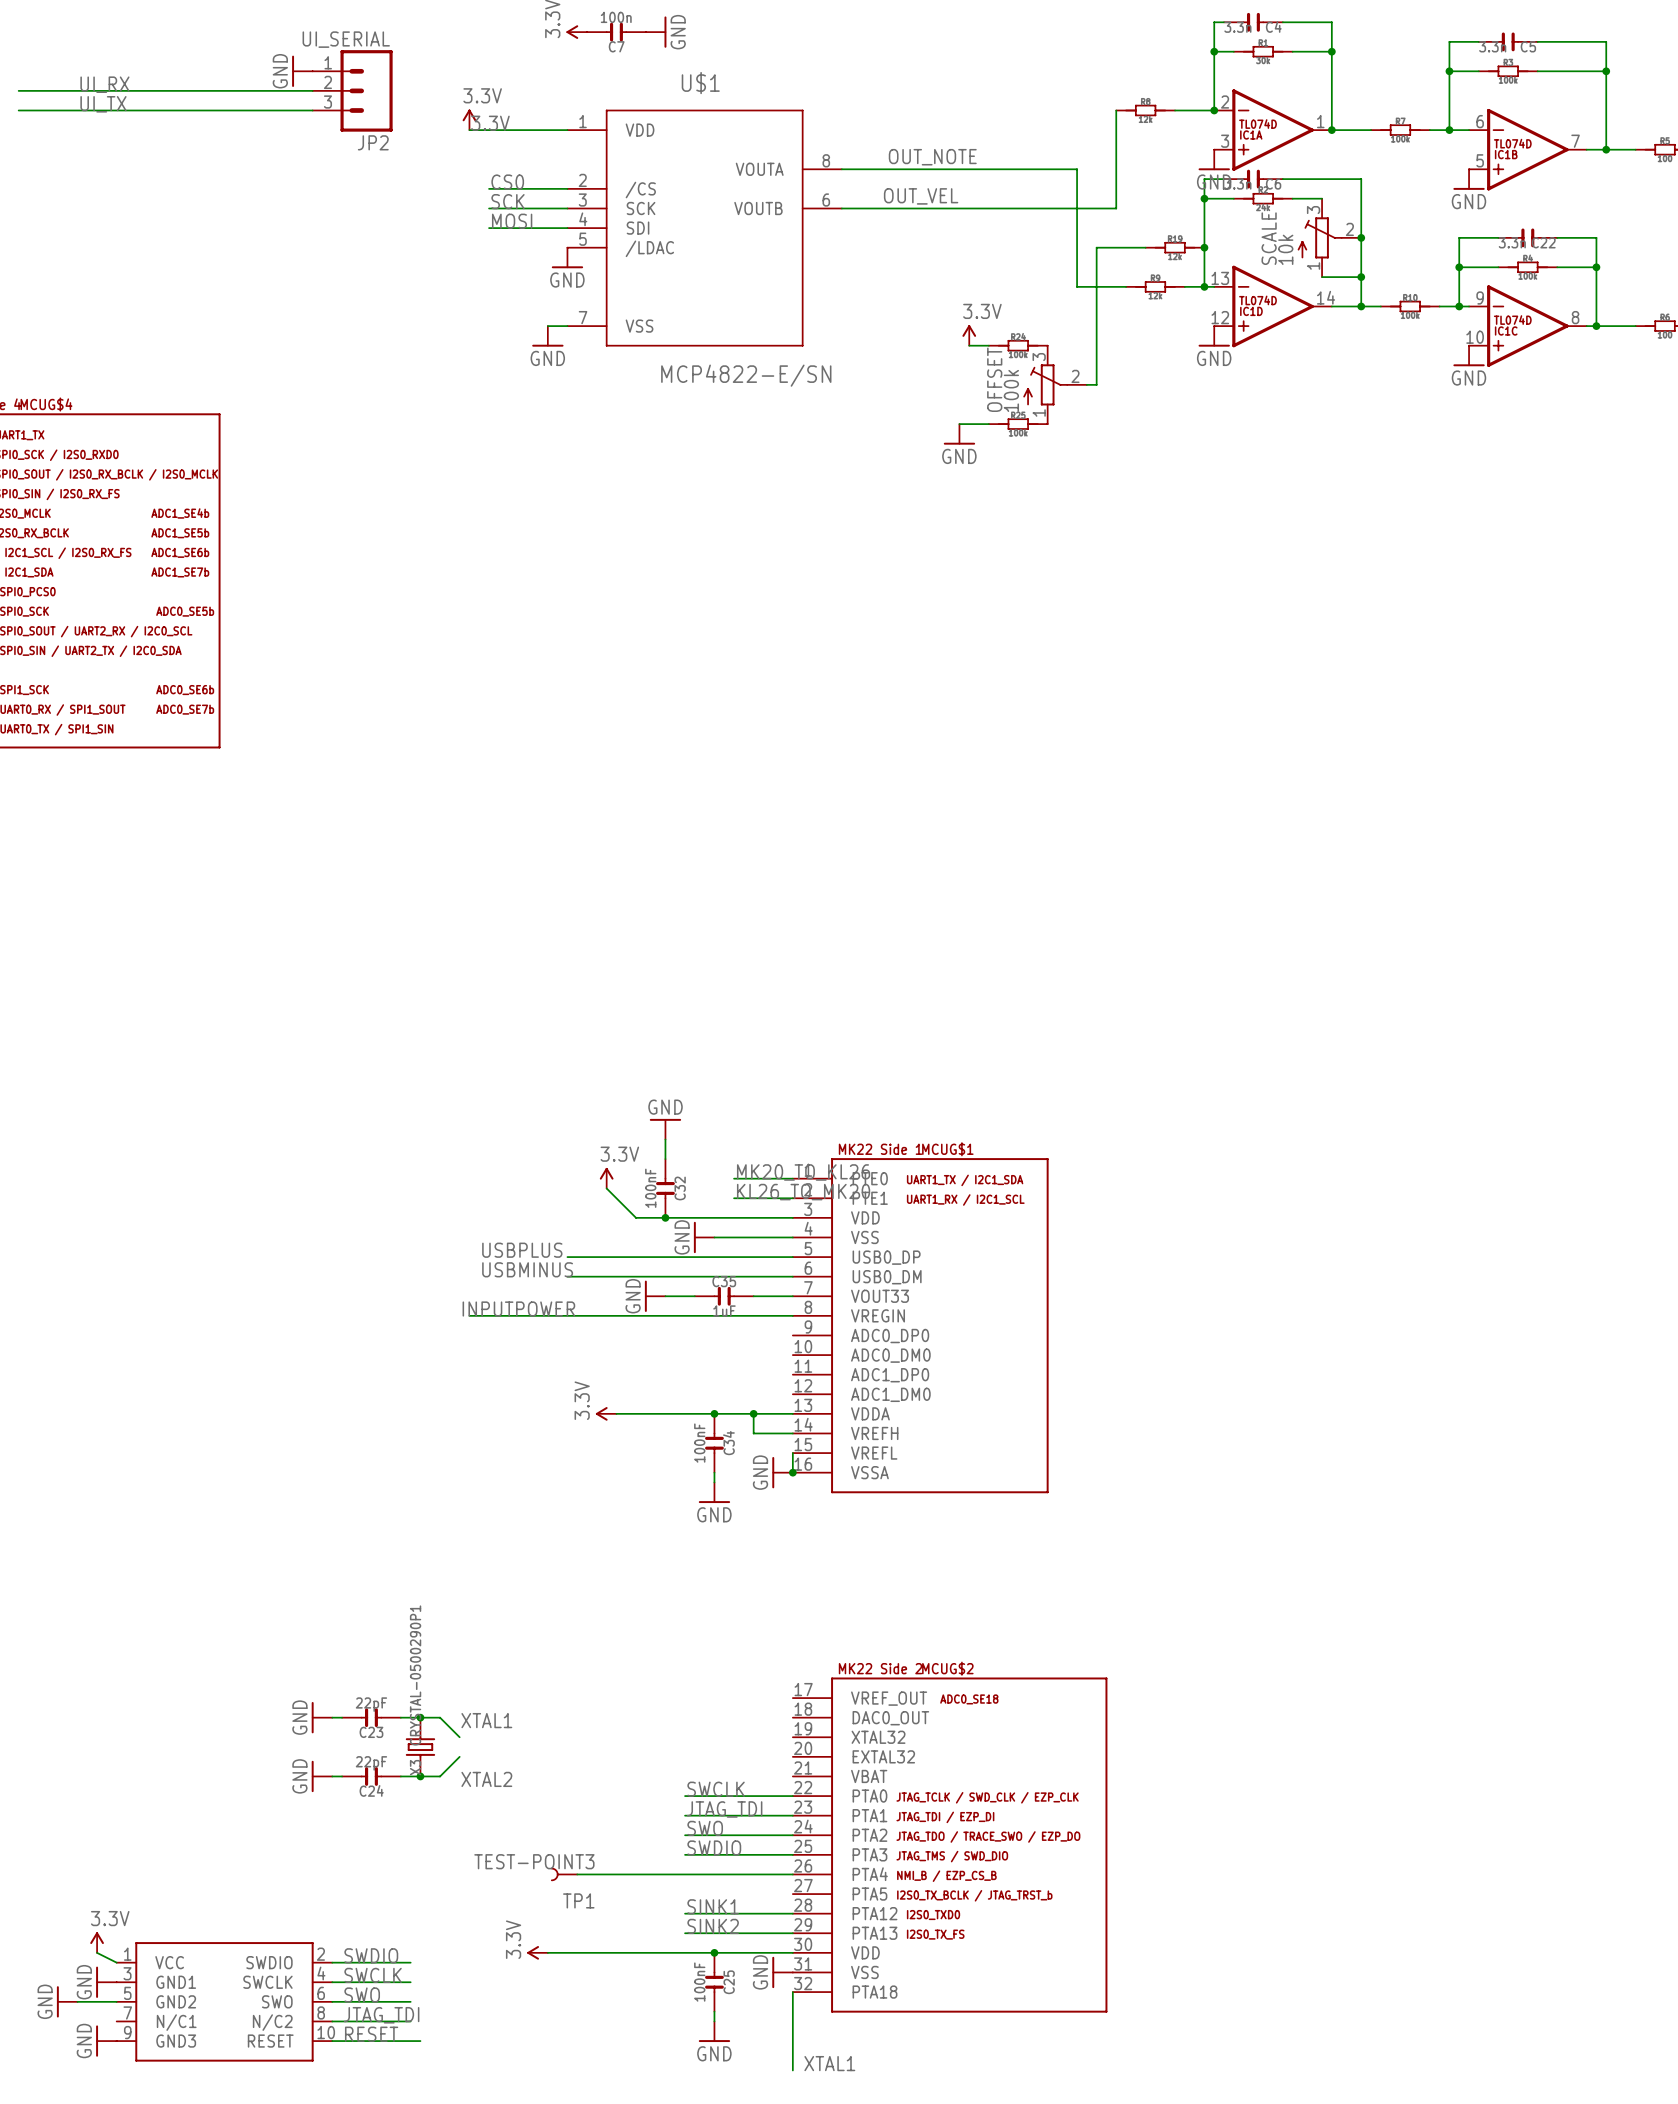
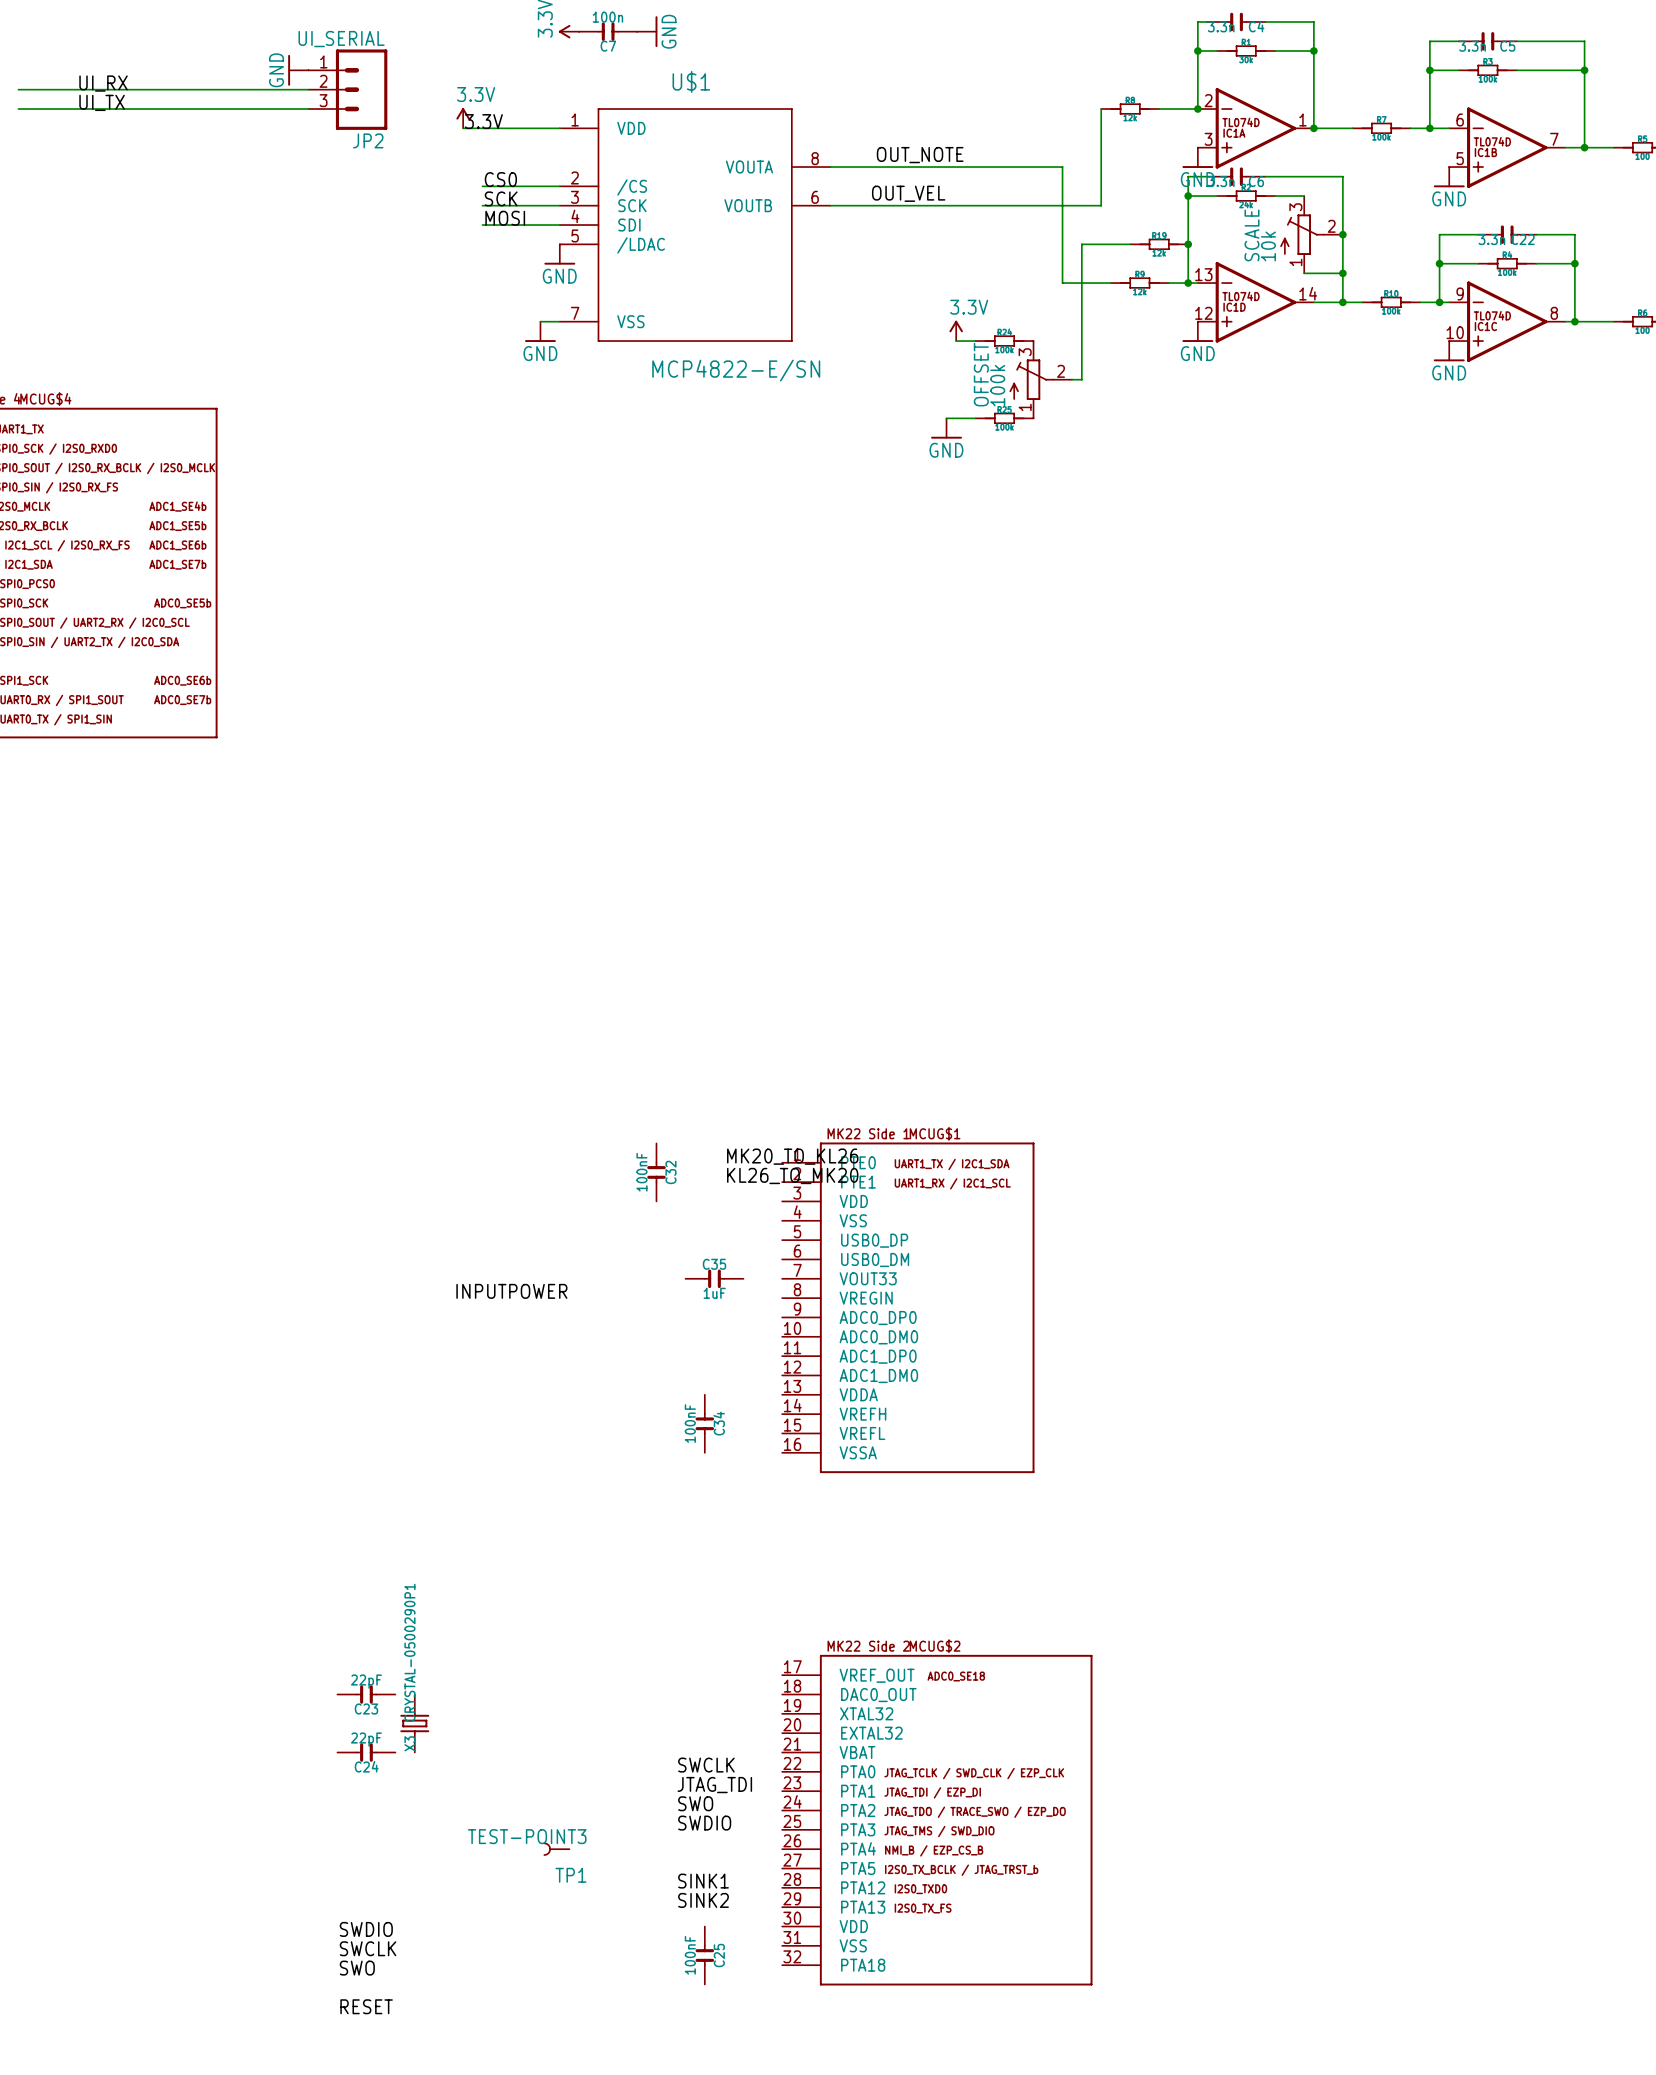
power symbol: GND (665, 1129) -> none
wire: (665, 1139) (665, 1159) -> none
power symbol: 3.3V (606, 1178) -> none
wire: (734, 1178) (792, 1178) -> none
wire: (606, 1188) (636, 1217) (792, 1217) -> none
wire: (734, 1198) (792, 1198) -> none
junction: (665, 1217) -> none
power symbol: GND (704, 1237) -> none
wire: (714, 1237) (792, 1237) -> none
label: USBPLUS (522, 1250) -> none
wire: (567, 1257) (792, 1257) -> none
label: USBMINUS (527, 1269) -> none
wire: (567, 1276) (792, 1276) -> none
power symbol: GND (655, 1296) -> none
wire: (665, 1296) (694, 1296) -> none
wire: (753, 1296) (792, 1296) -> none
wire: (469, 1315) (792, 1315) -> none
power symbol: 3.3V (606, 1413) -> none
wire: (616, 1413) (792, 1413) -> none
junction: (714, 1413) -> none
wire: (753, 1413) (753, 1433) (792, 1433) -> none
junction: (753, 1413) -> none
wire: (792, 1453) (792, 1472) -> none
wire: (714, 1472) (714, 1482) -> none
power symbol: GND (782, 1472) -> none
junction: (792, 1472) -> none
power symbol: GND (714, 1492) -> none
power symbol: GND (321, 1717) -> none
wire: (332, 1717) (342, 1717) -> none
wire: (400, 1717) (440, 1717) (459, 1737) -> none
junction: (420, 1717) -> none
label: XTAL1 (486, 1720) -> none
wire: (459, 1756) (440, 1776) (400, 1776) -> none
power symbol: GND (321, 1776) -> none
wire: (332, 1776) (342, 1776) -> none
junction: (420, 1776) -> none
label: XTAL2 (486, 1779) -> none
wire: (685, 1796) (792, 1796) -> none
wire: (685, 1815) (792, 1815) -> none
wire: (685, 1835) (792, 1835) -> none
wire: (685, 1854) (792, 1854) -> none
wire: (577, 1874) (792, 1874) -> none
wire: (685, 1913) (792, 1913) -> none
wire: (685, 1933) (792, 1933) -> none
power symbol: 3.3V (97, 1942) -> none
wire: (97, 1952) (116, 1962) -> none
power symbol: 3.3V (537, 1952) -> none
wire: (547, 1952) (792, 1952) -> none
junction: (714, 1952) -> none
wire: (332, 1962) (410, 1962) -> none
power symbol: GND (782, 1972) -> none
power symbol: GND (106, 1982) -> none
wire: (332, 1982) (410, 1982) -> none
wire: (792, 1992) (792, 2070) -> none
power symbol: GND (67, 2001) -> none
wire: (77, 2001) (116, 2001) -> none
part: (224, 2001) -> none
wire: (332, 2001) (410, 2001) -> none
wire: (714, 2011) (714, 2021) -> none
label: JTAG_TDI (381, 2015) -> none
wire: (332, 2021) (410, 2021) -> none
power symbol: GND (714, 2031) -> none
power symbol: GND (106, 2041) -> none
wire: (332, 2041) (420, 2041) -> none
label: XTAL1 (829, 2063) -> none

